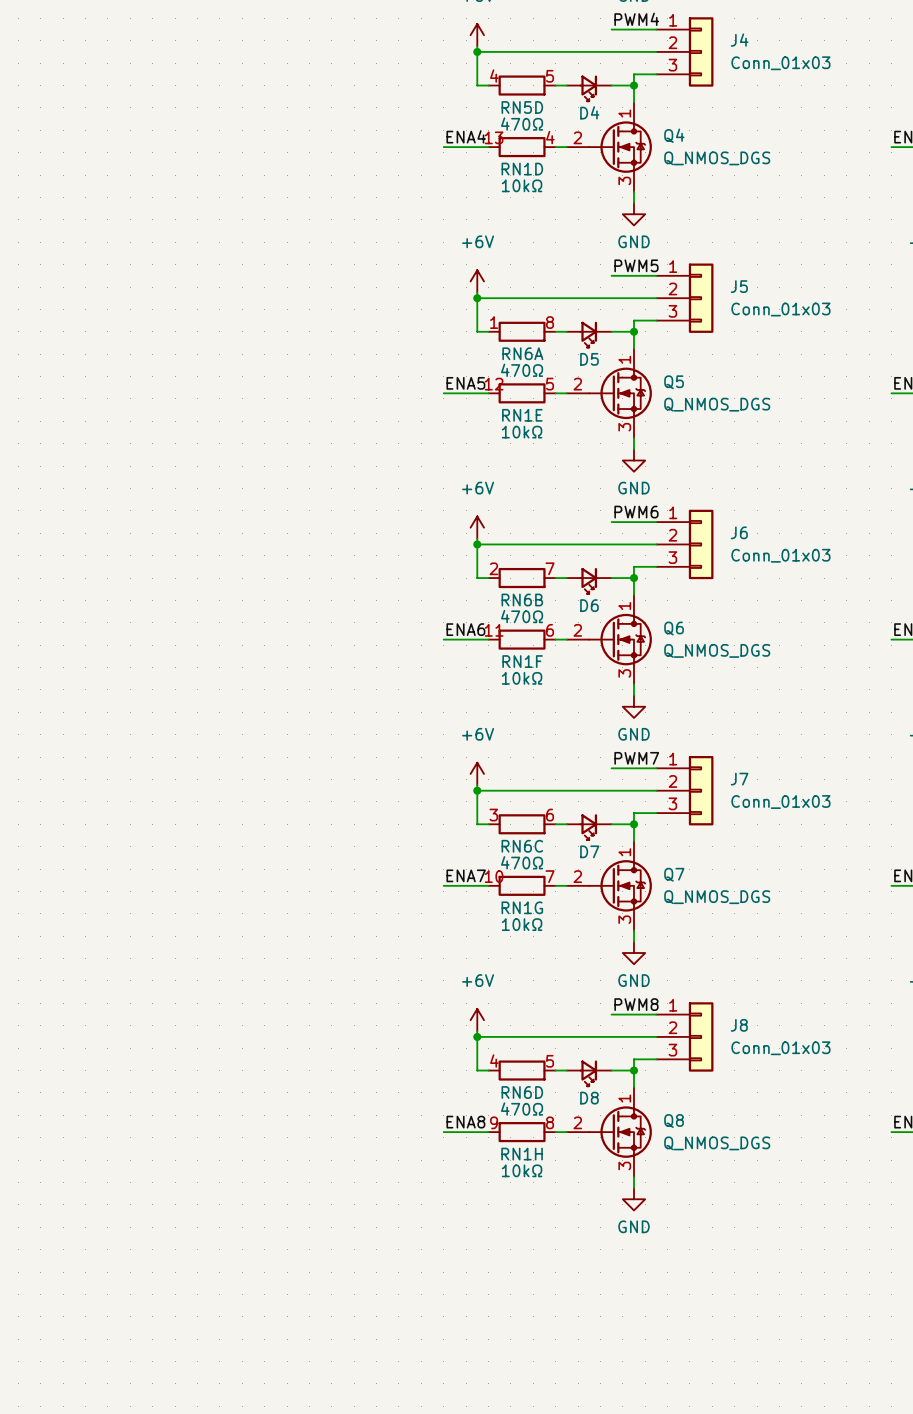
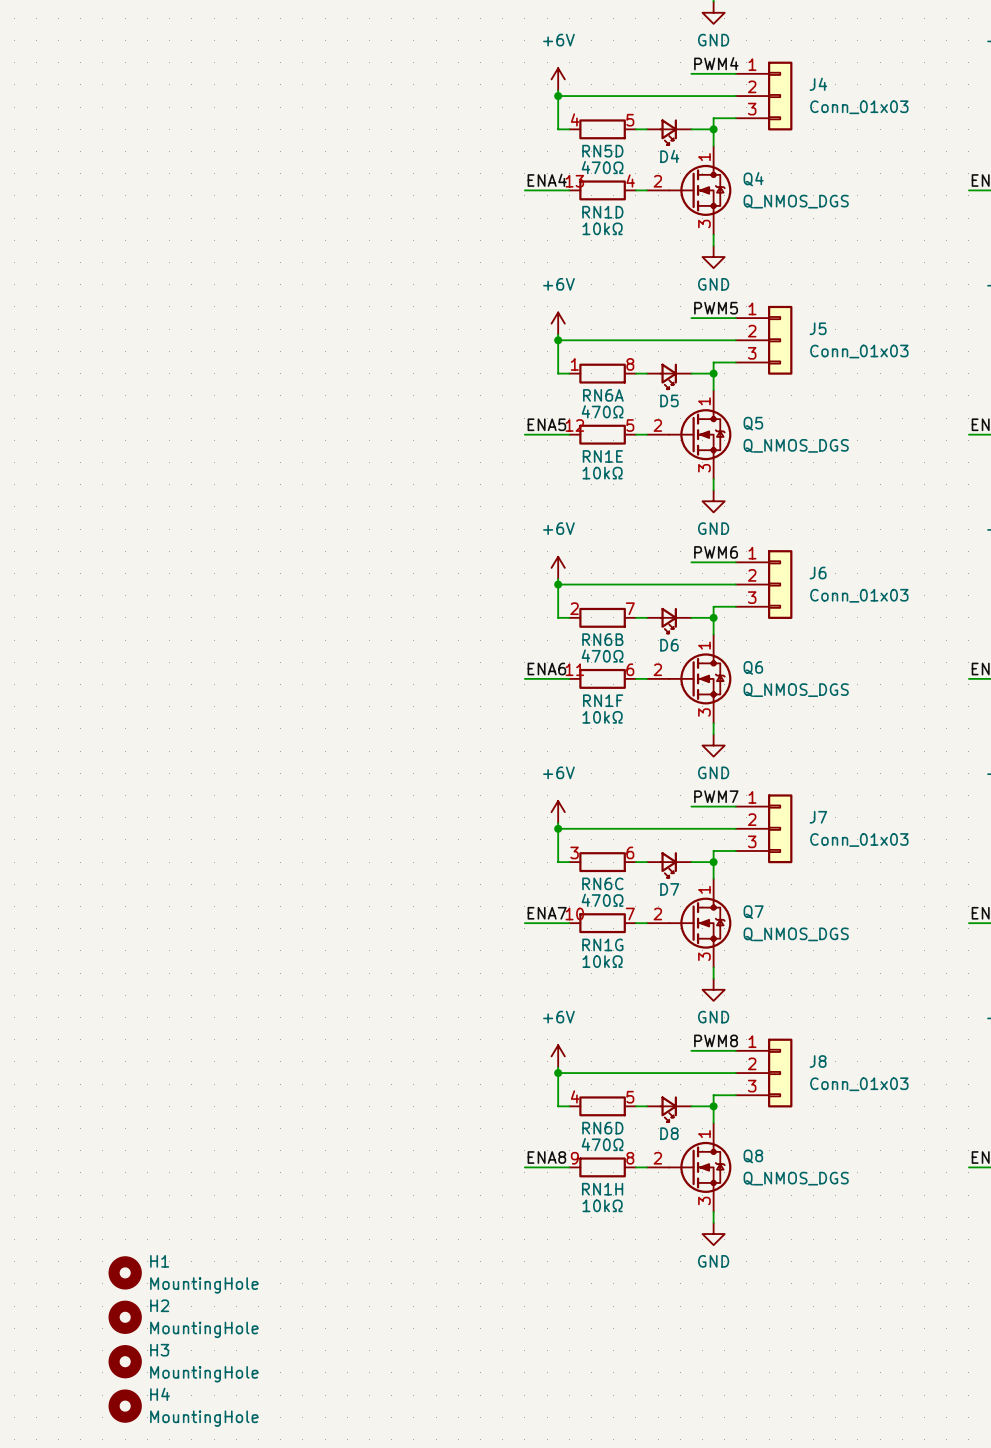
H1: none -> MountingHole (125, 1272)
H2: none -> MountingHole (125, 1317)
H3: none -> MountingHole (125, 1361)
H4: none -> MountingHole (125, 1406)

